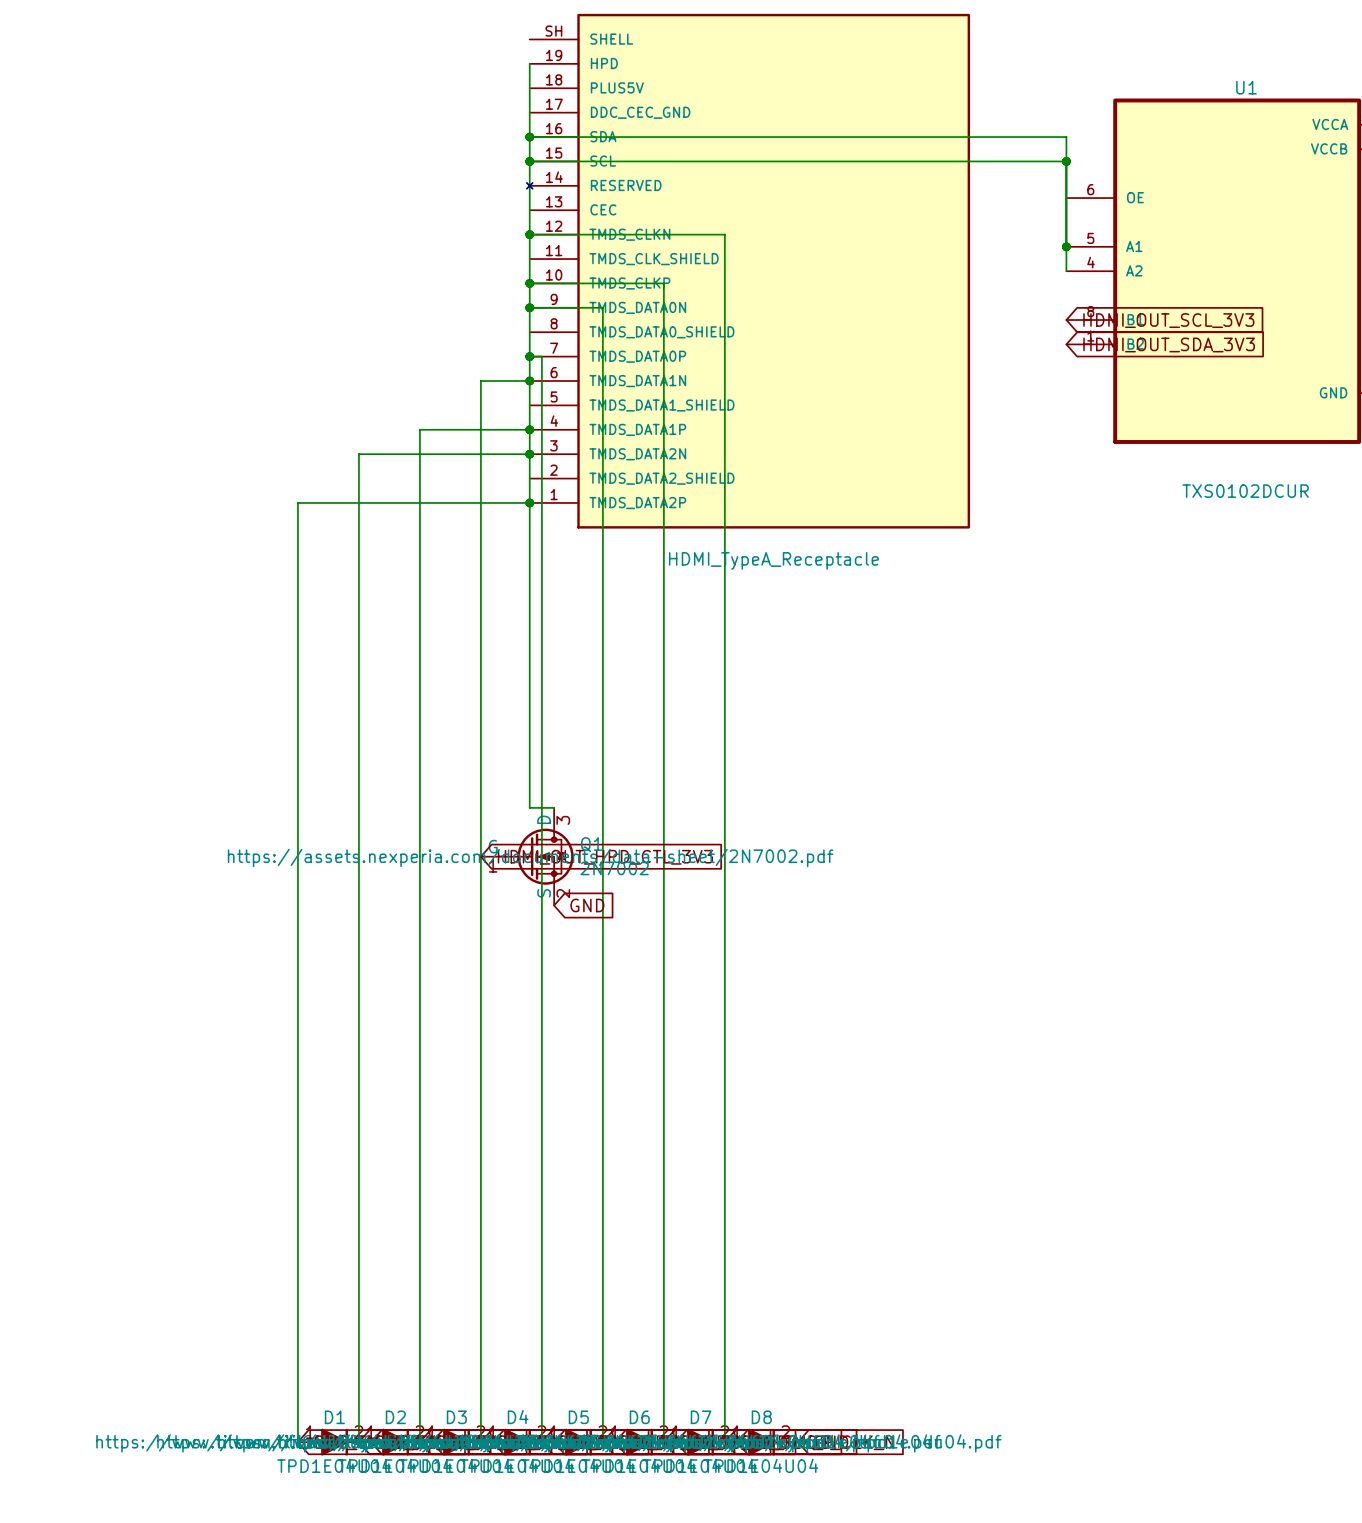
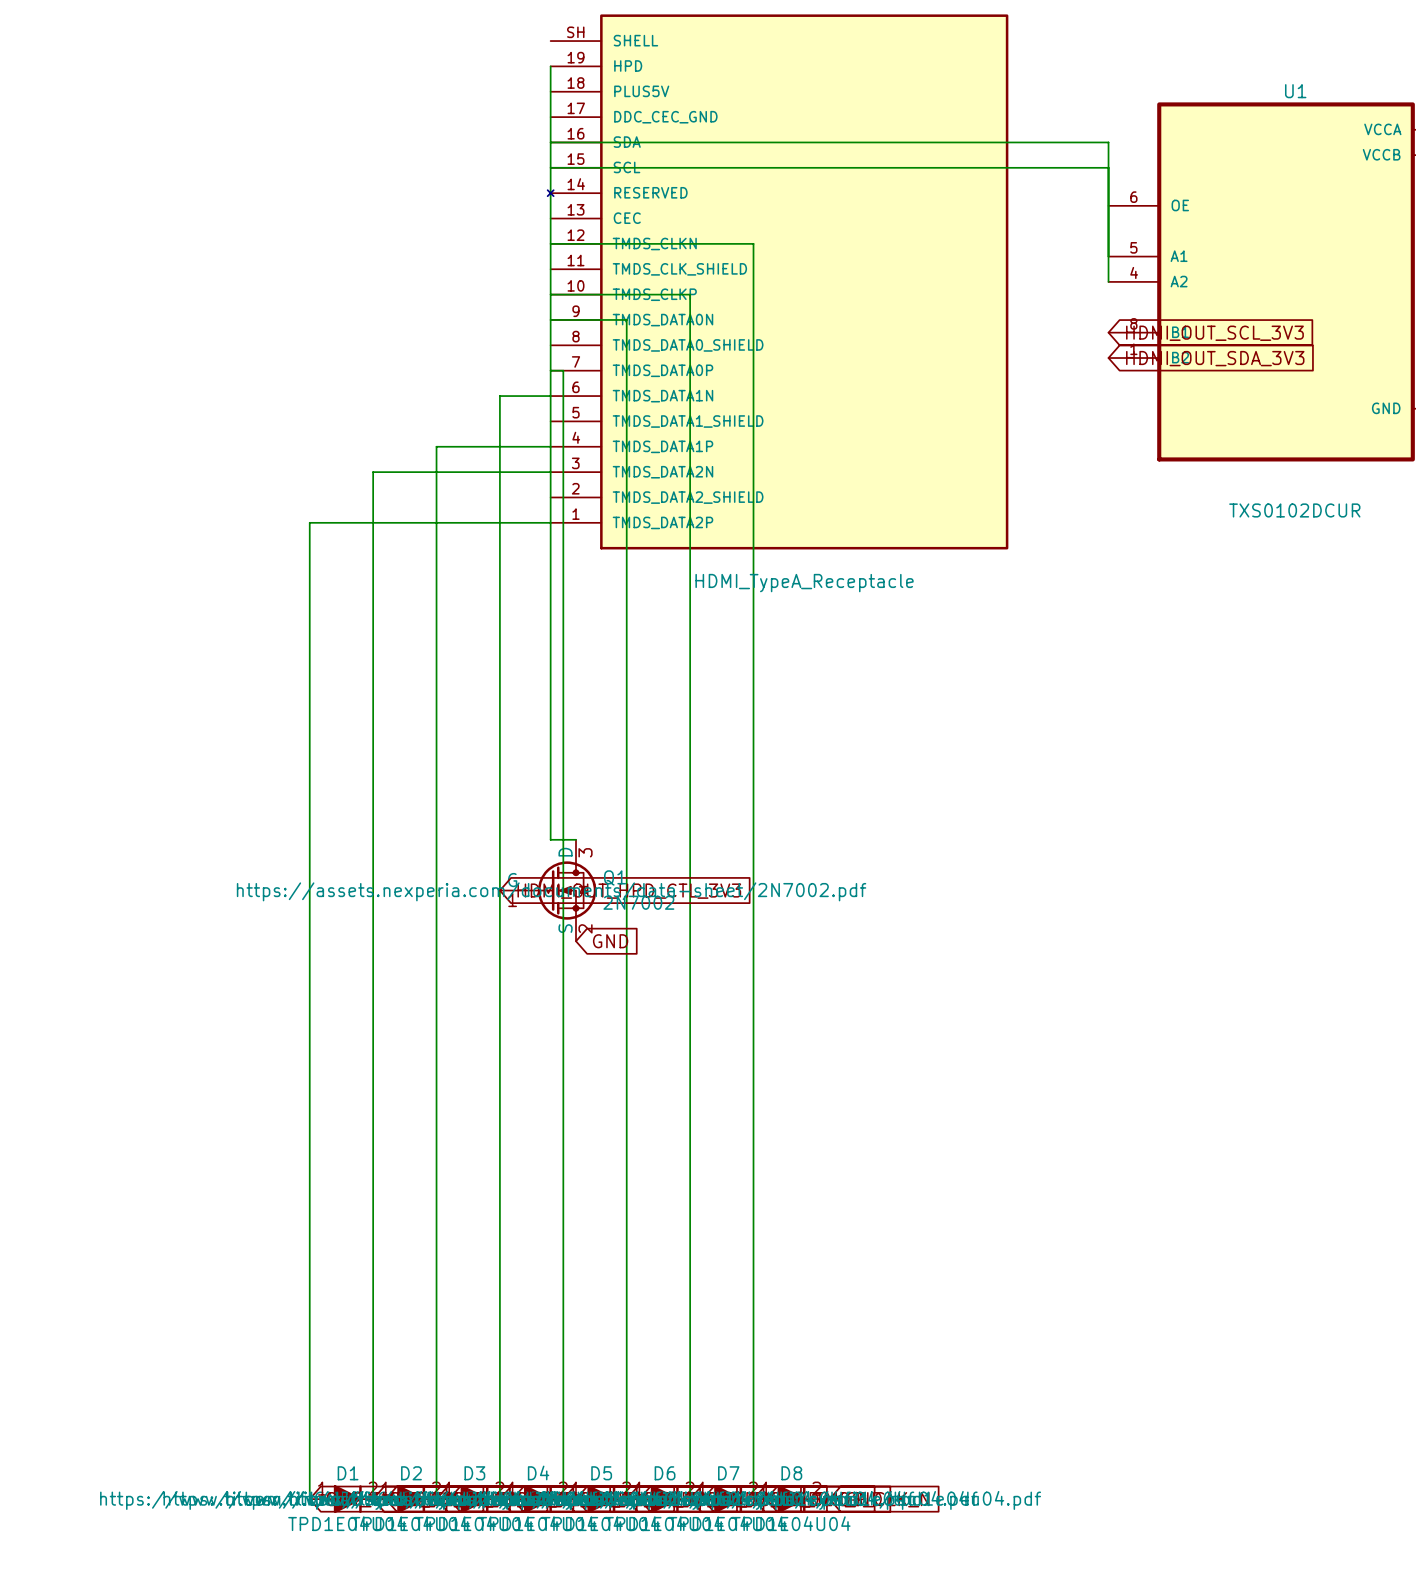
junction: (529, 137) -> none
junction: (529, 161) -> none
junction: (1066, 161) -> none
junction: (529, 234) -> none
junction: (1066, 246) -> none
junction: (529, 283) -> none
junction: (529, 307) -> none
junction: (529, 356) -> none
junction: (529, 381) -> none
junction: (529, 429) -> none
junction: (529, 454) -> none
junction: (529, 502) -> none

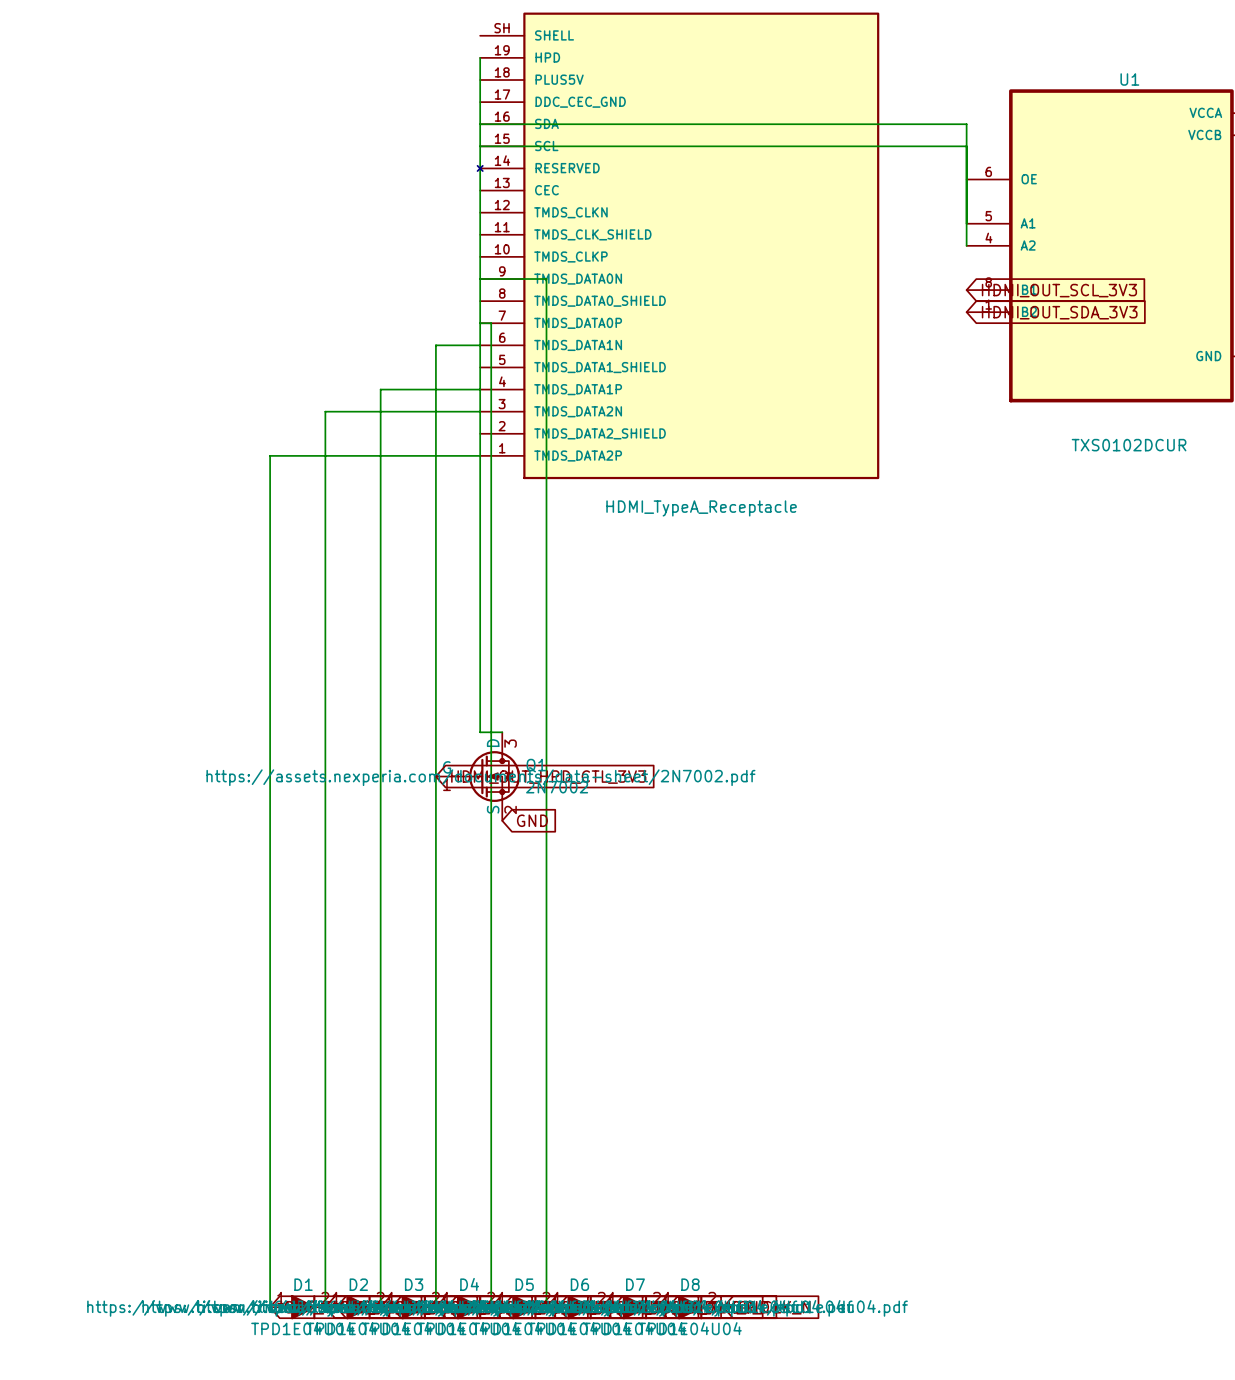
wire: (550, 243) (753, 243) (753, 1499) -> none
wire: (550, 294) (690, 294) (690, 1499) -> none

